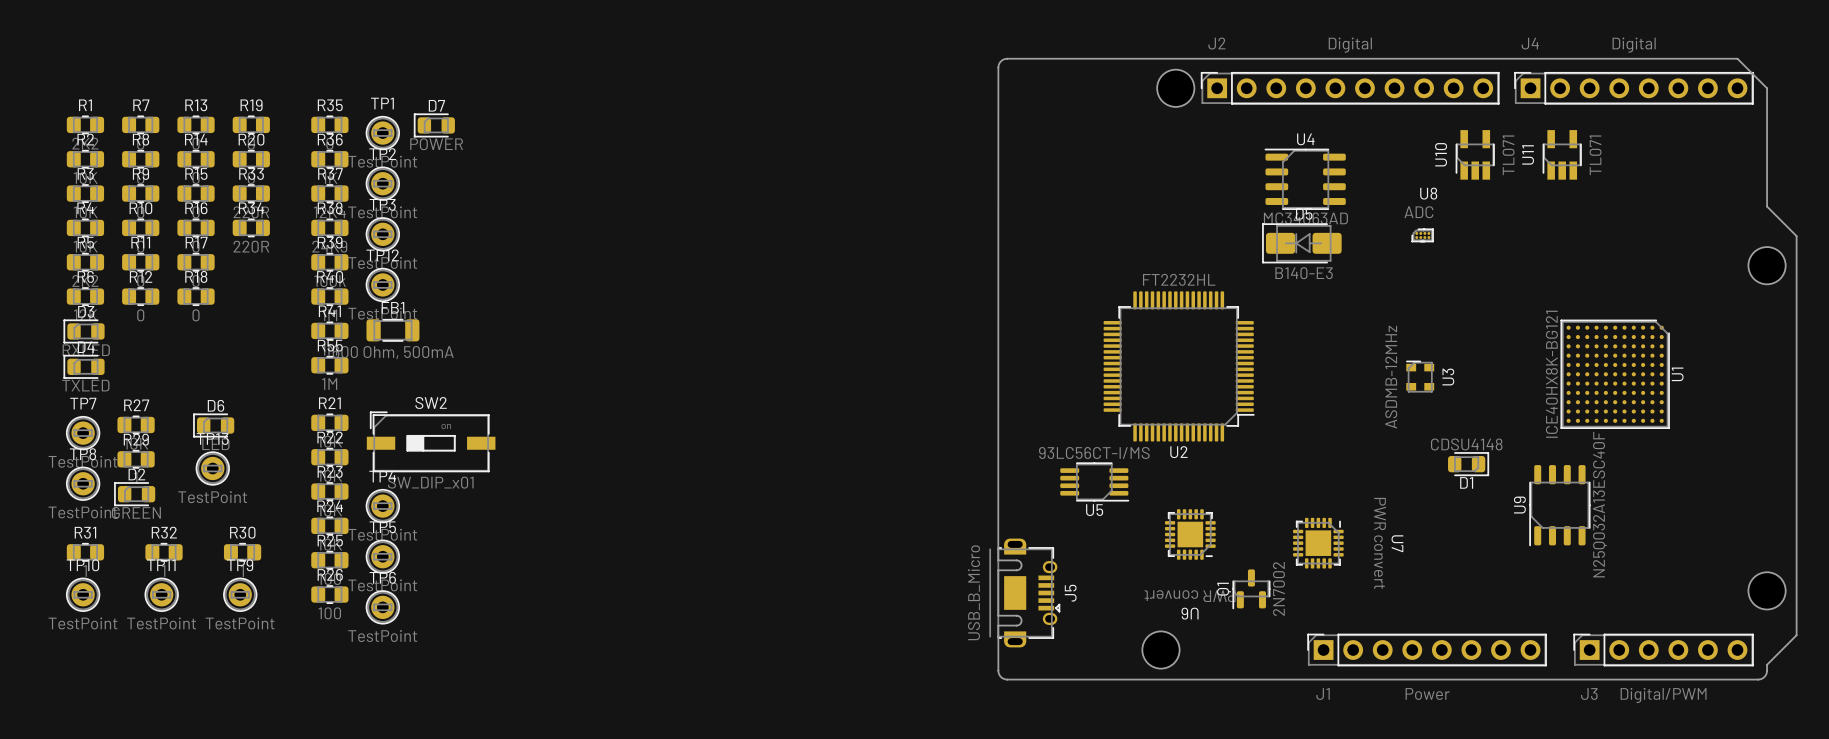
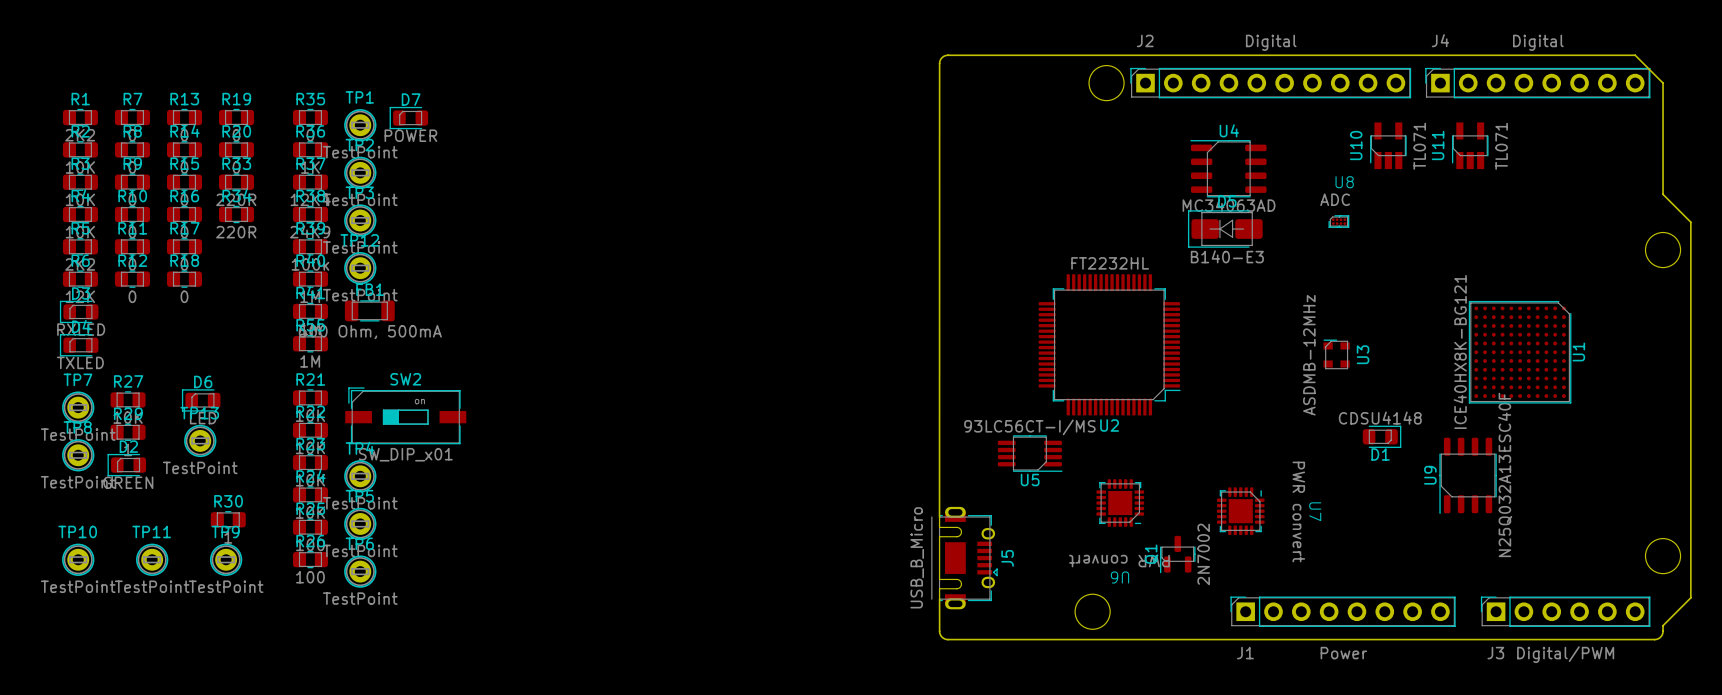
R31: 1 (85, 552) -> none
R32: 1 (164, 552) -> none

